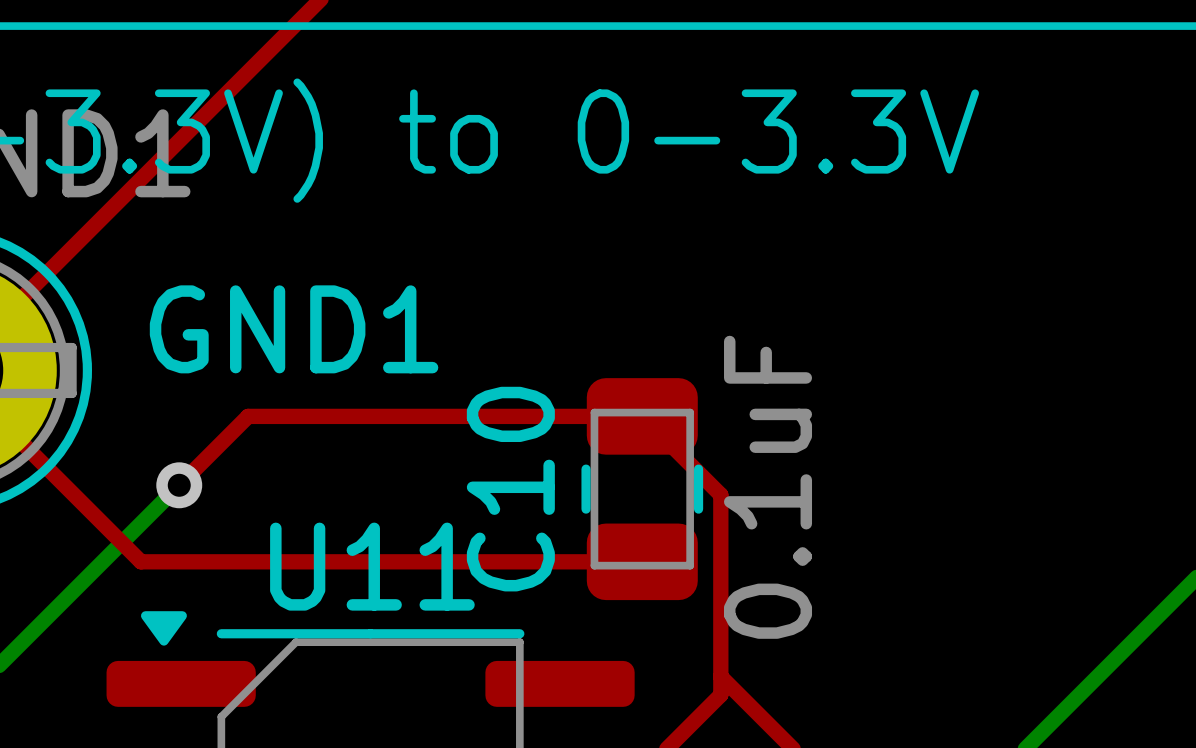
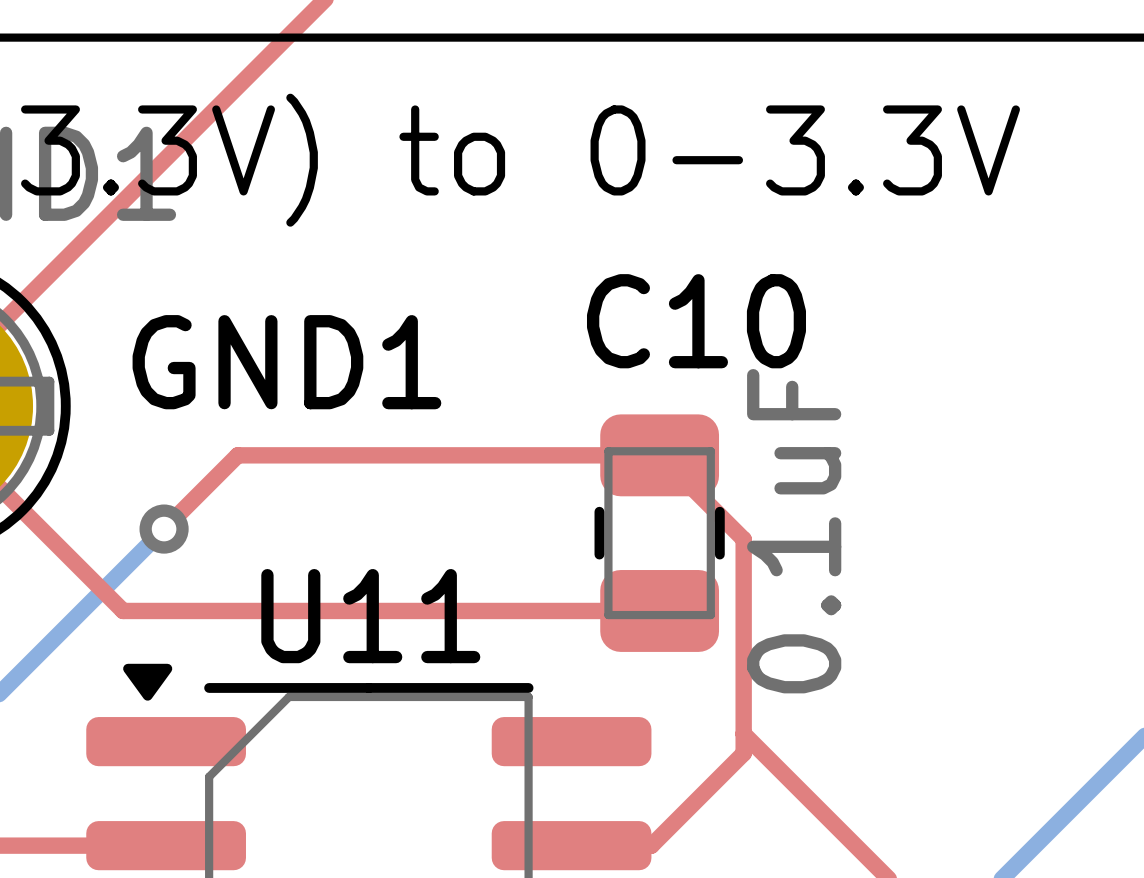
C10 name rotation: 0° (510, 489) -> 90° clockwise (696, 321)

